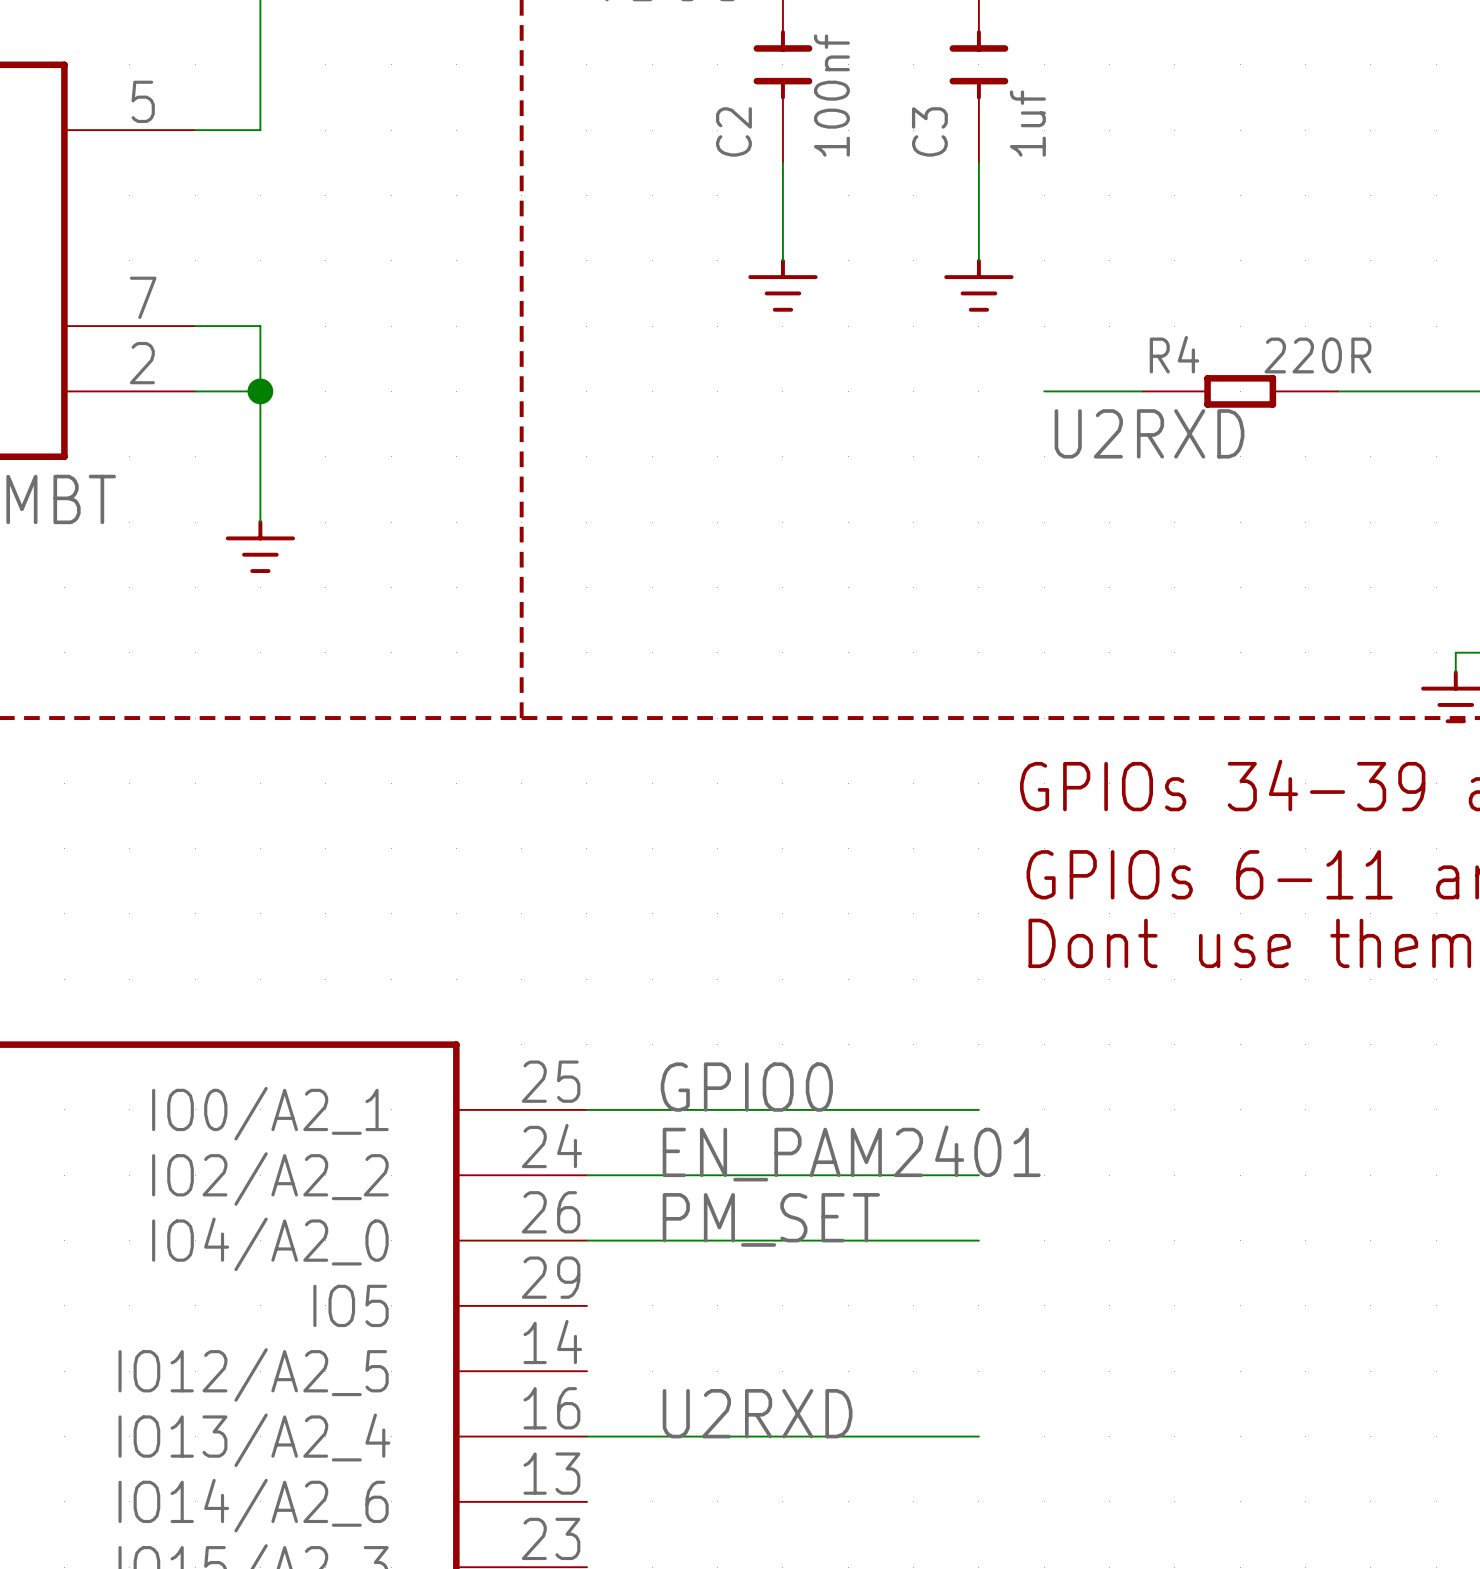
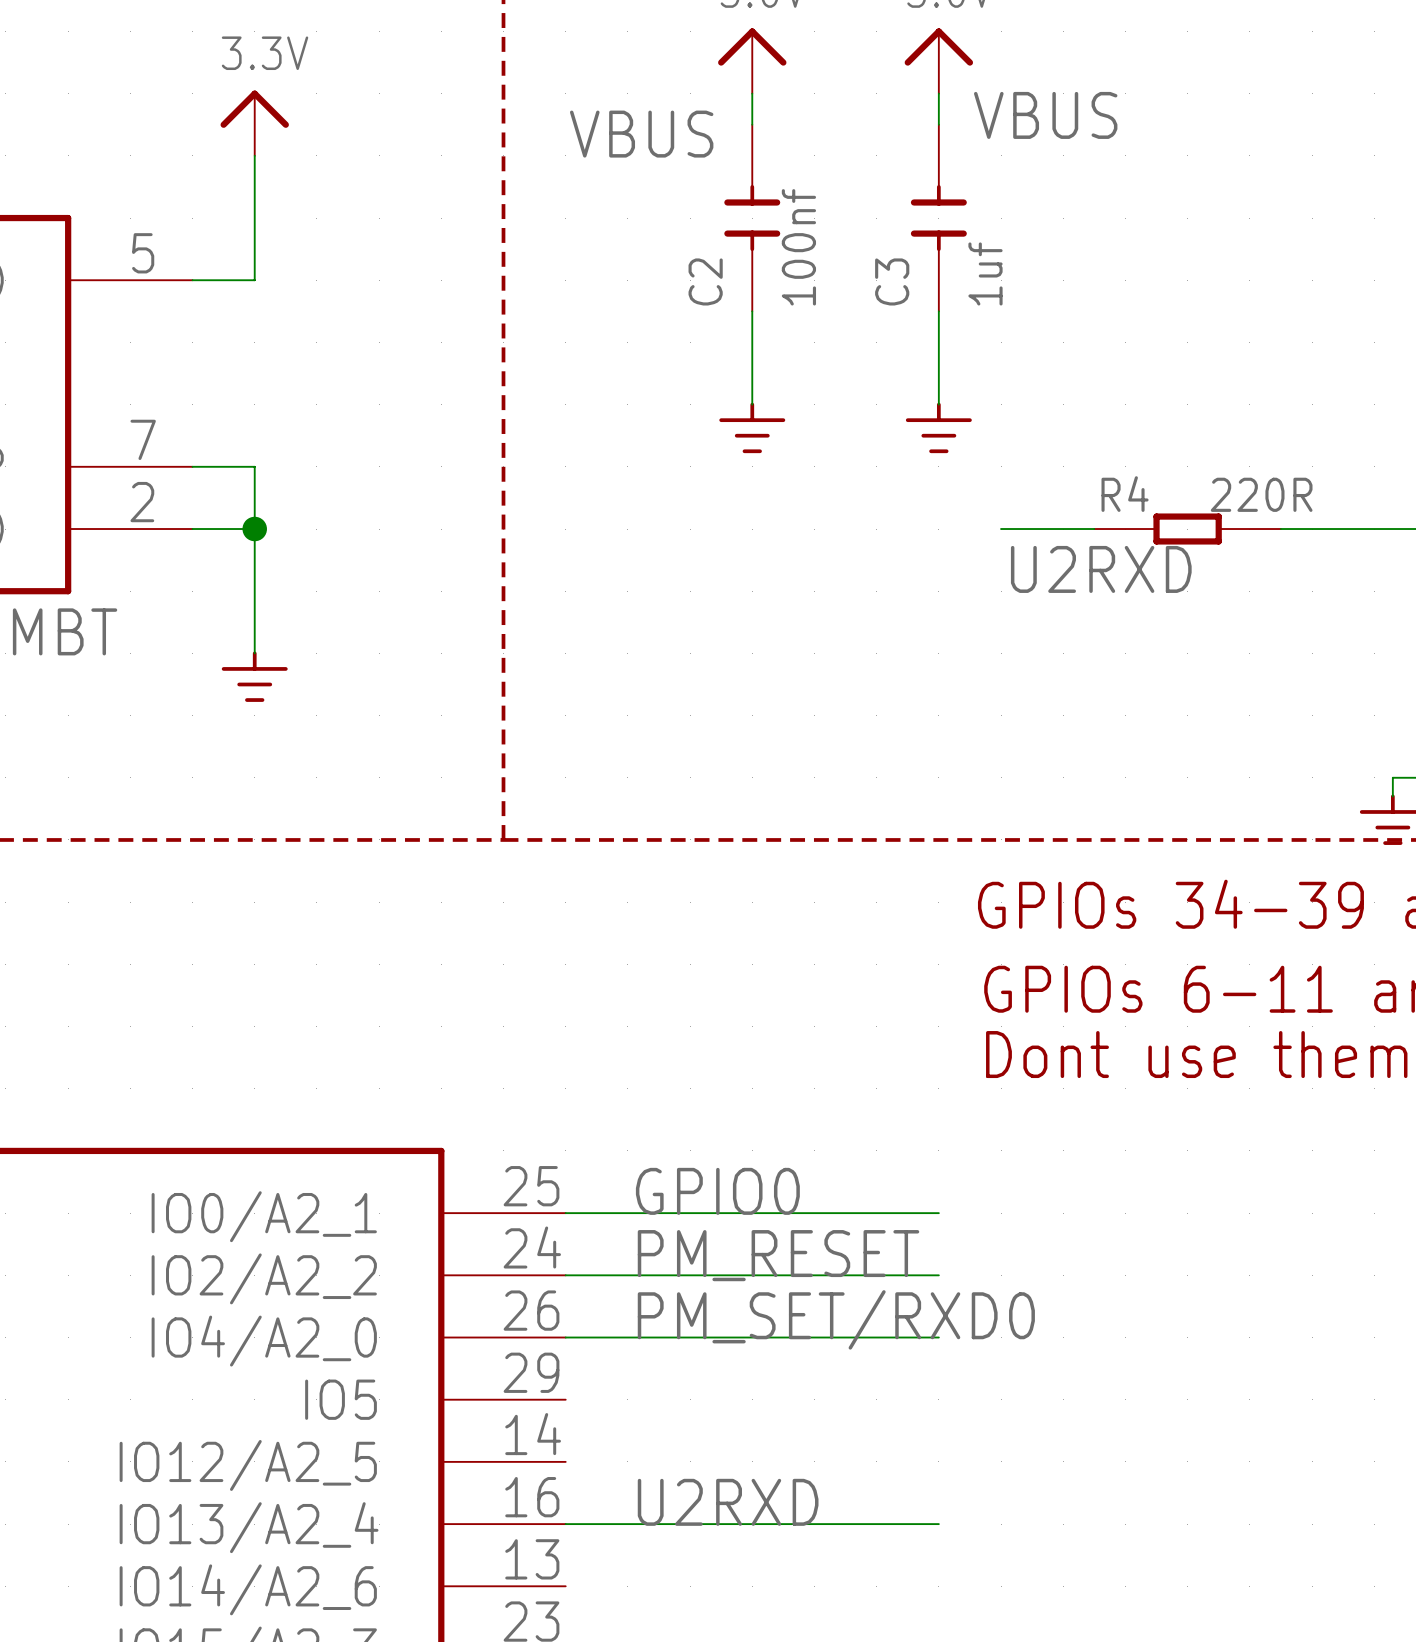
label: EN_PAM2401 (851, 1153) -> PM_RESET (778, 1255)
label: PM_SET (771, 1219) -> PM_SET/RXD0 (836, 1319)

